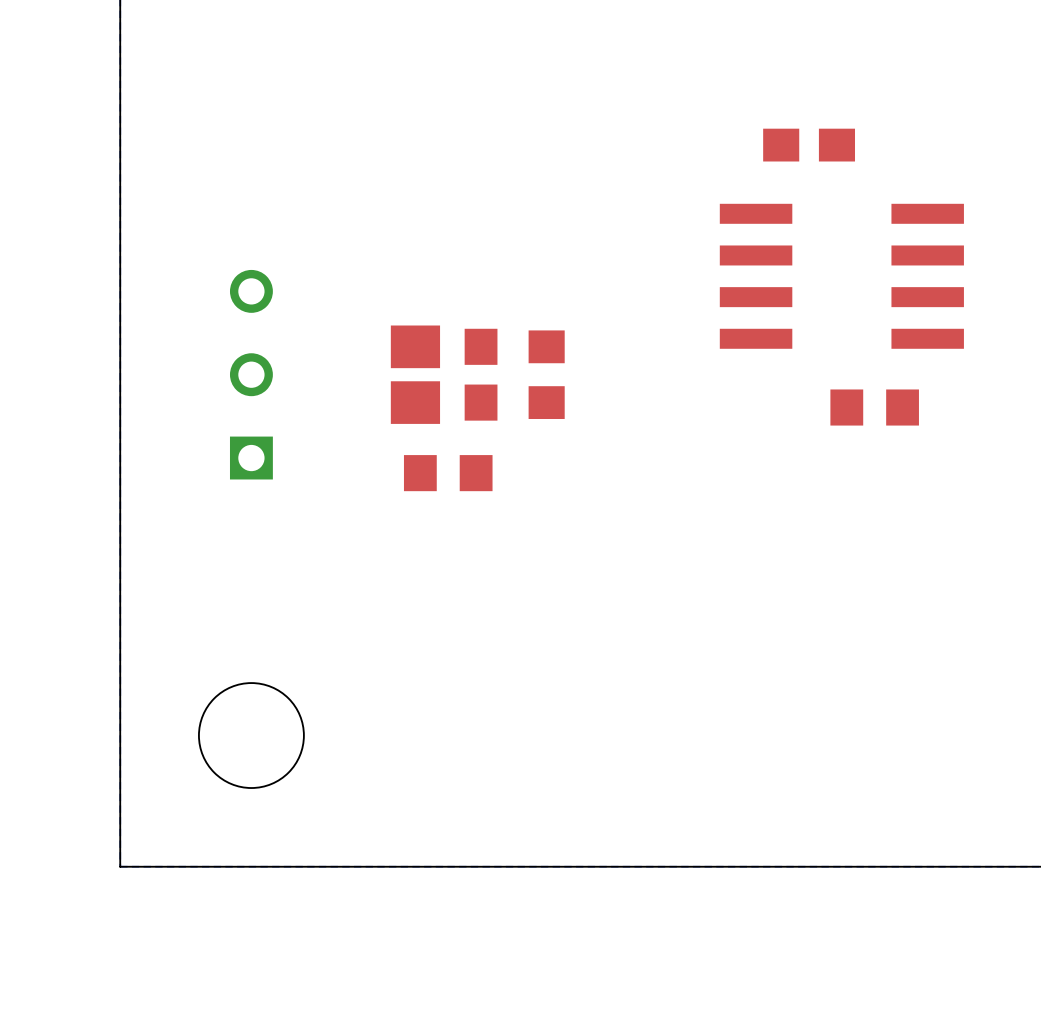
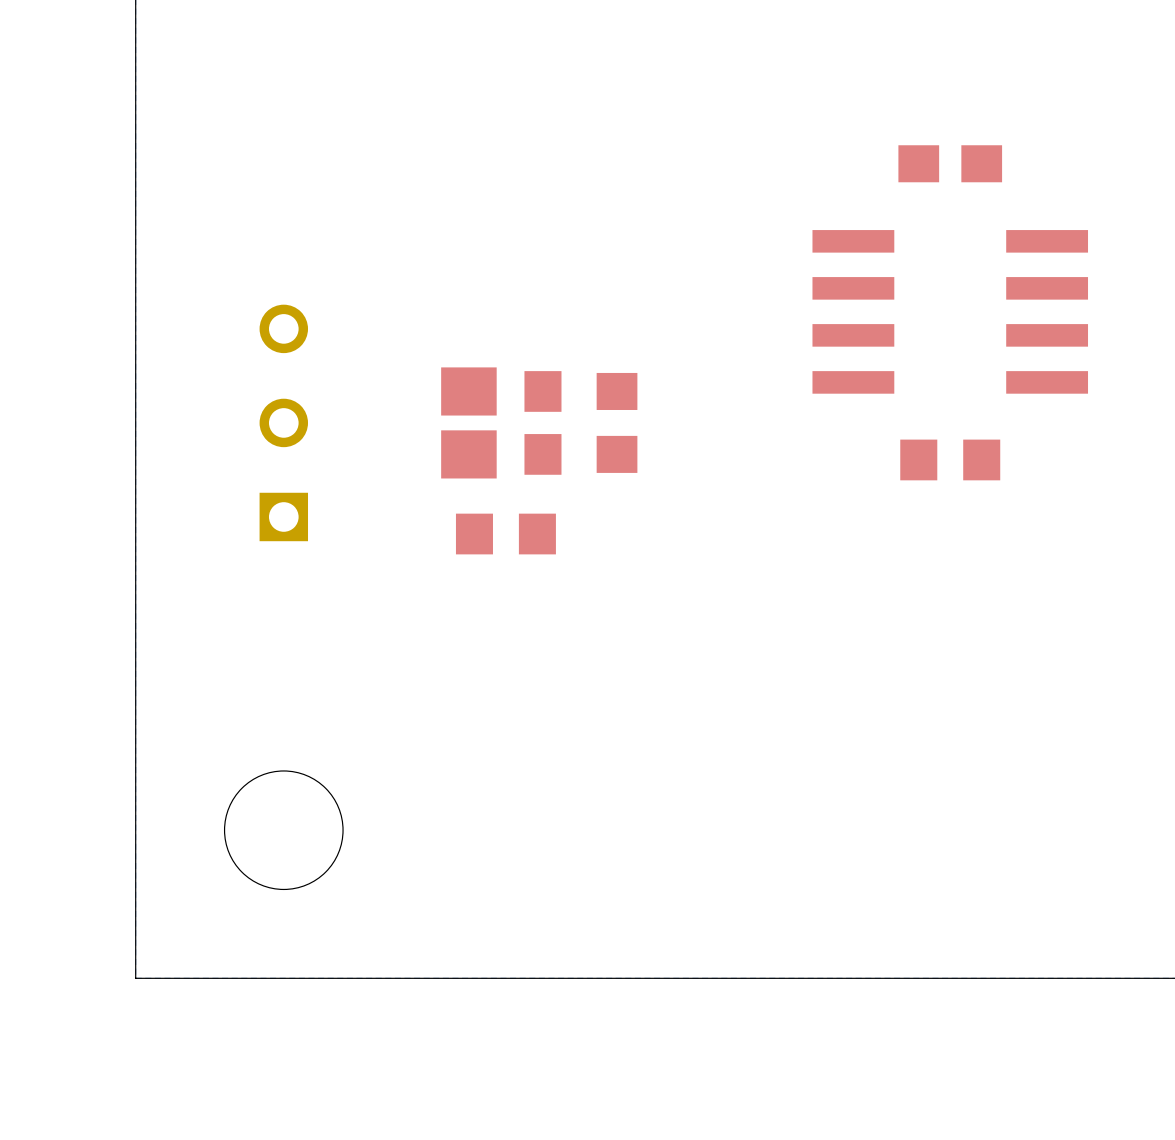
part position: (809, 145) -> (950, 163)
part position: (874, 407) -> (950, 459)

